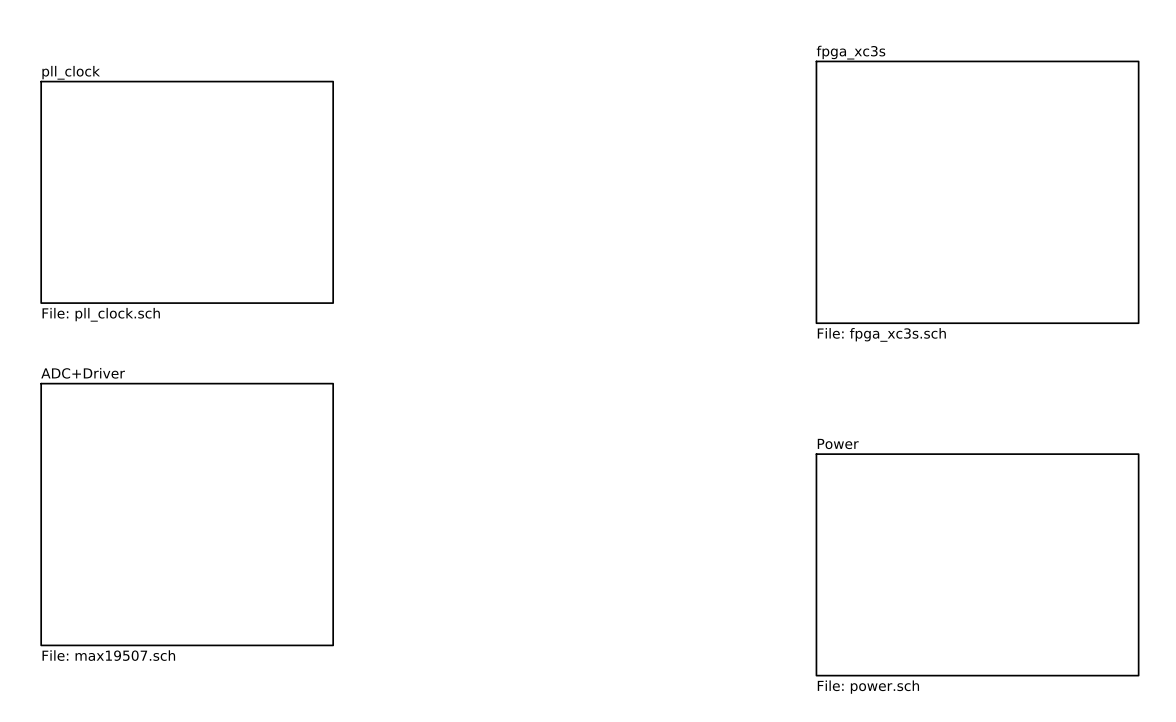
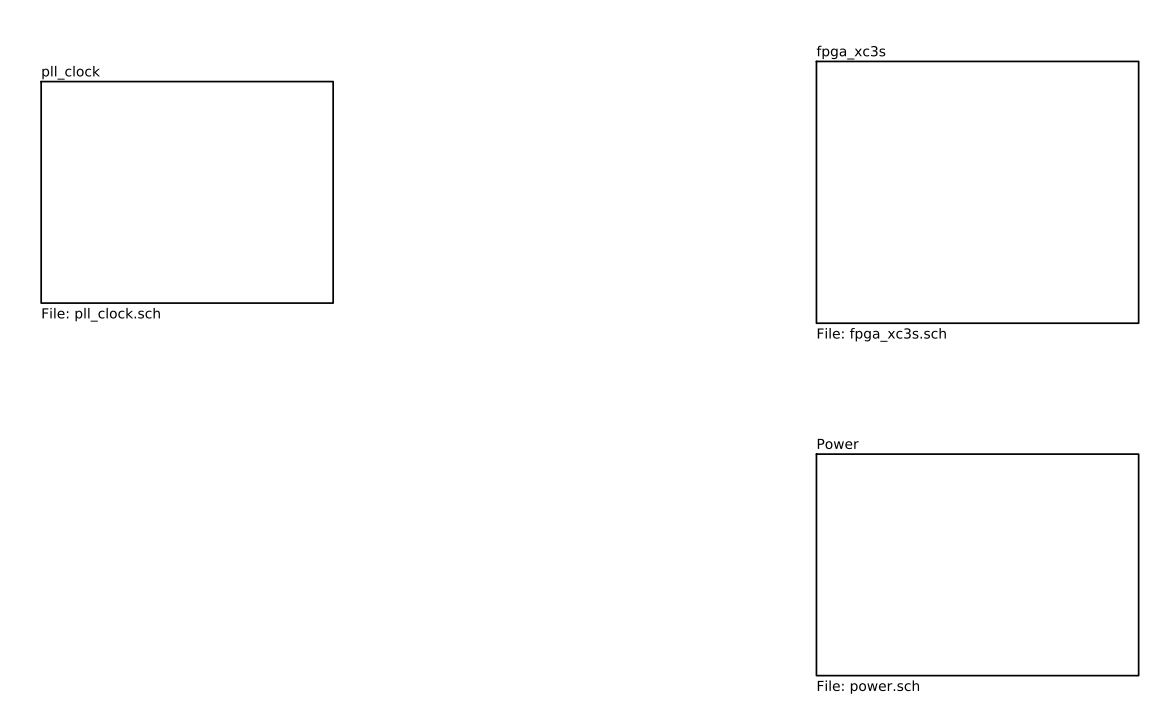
sheet ADC+Driver: File: max19507.sch (187, 514) -> none

